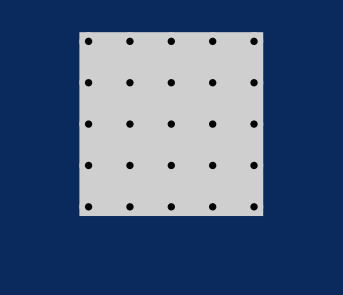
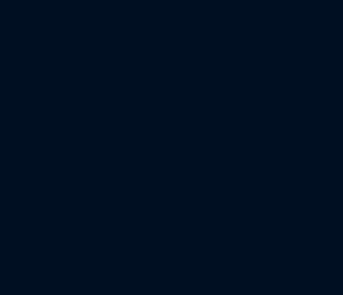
part: (171, 124) -> none

